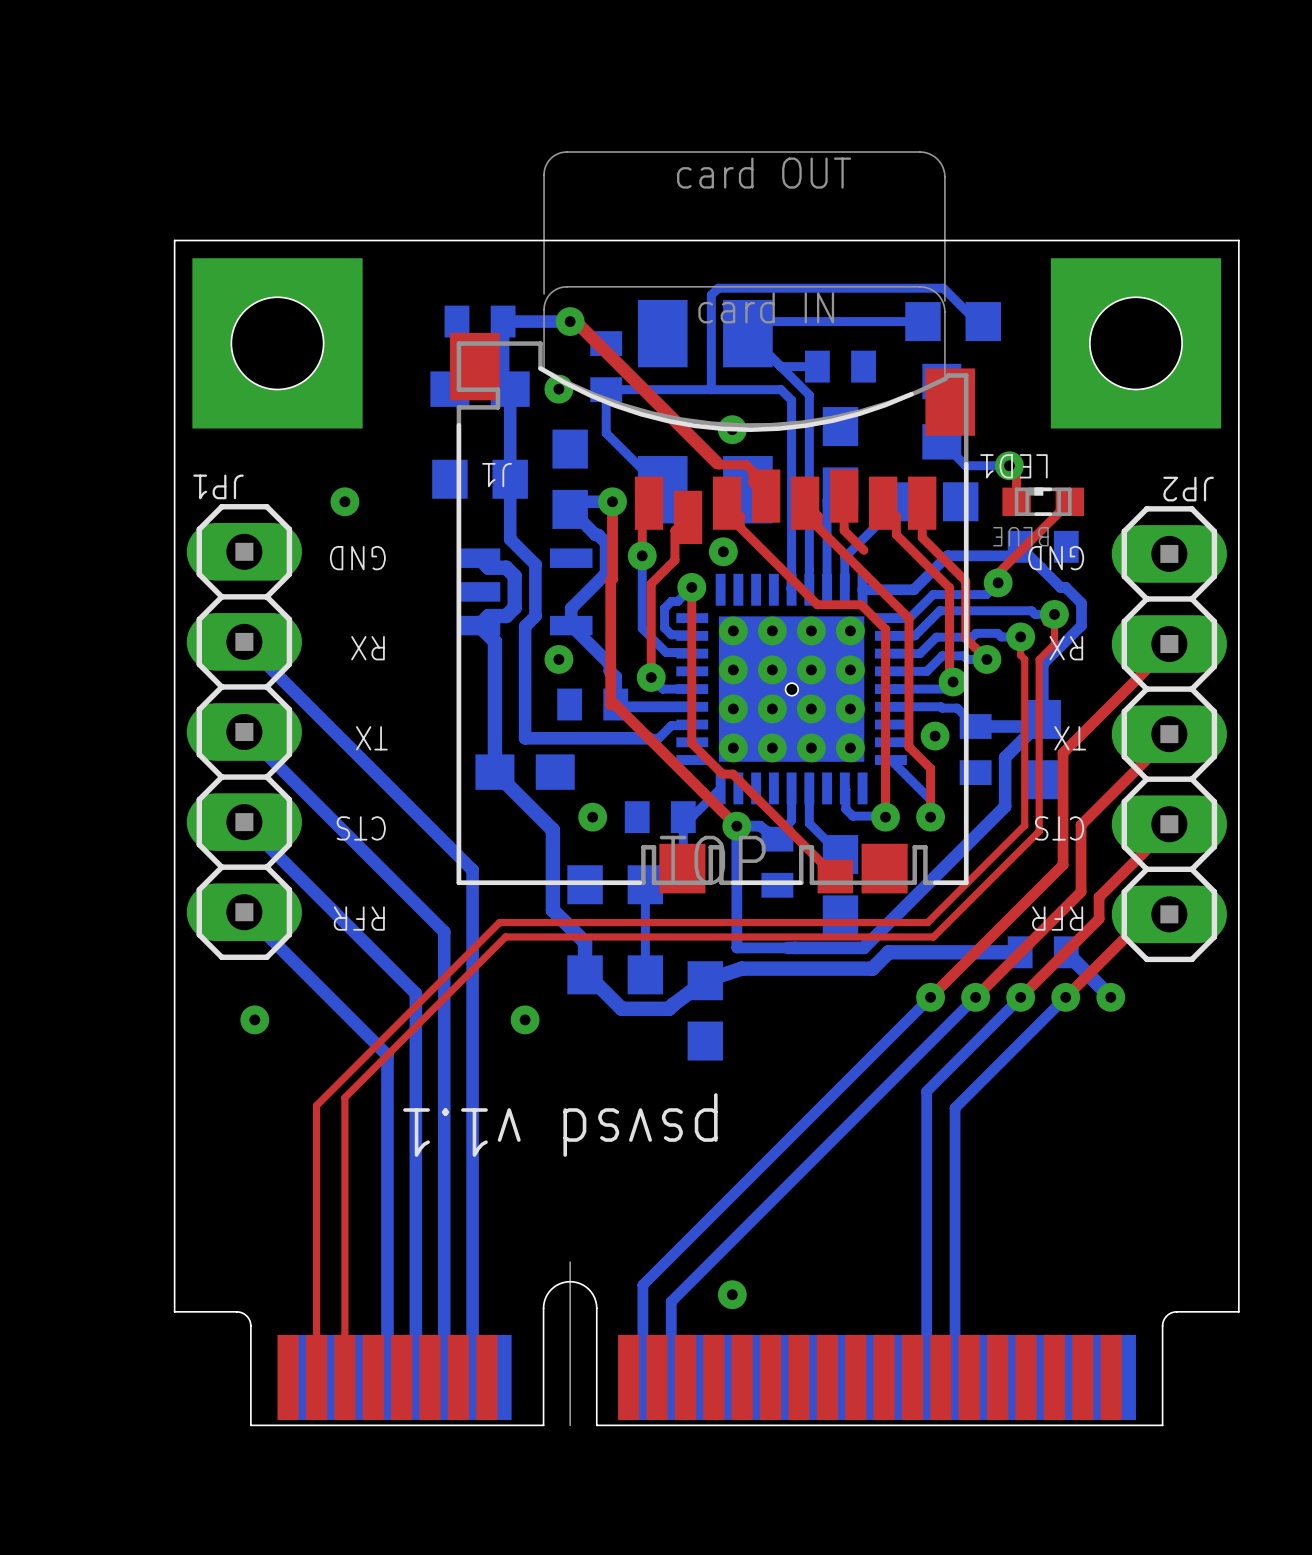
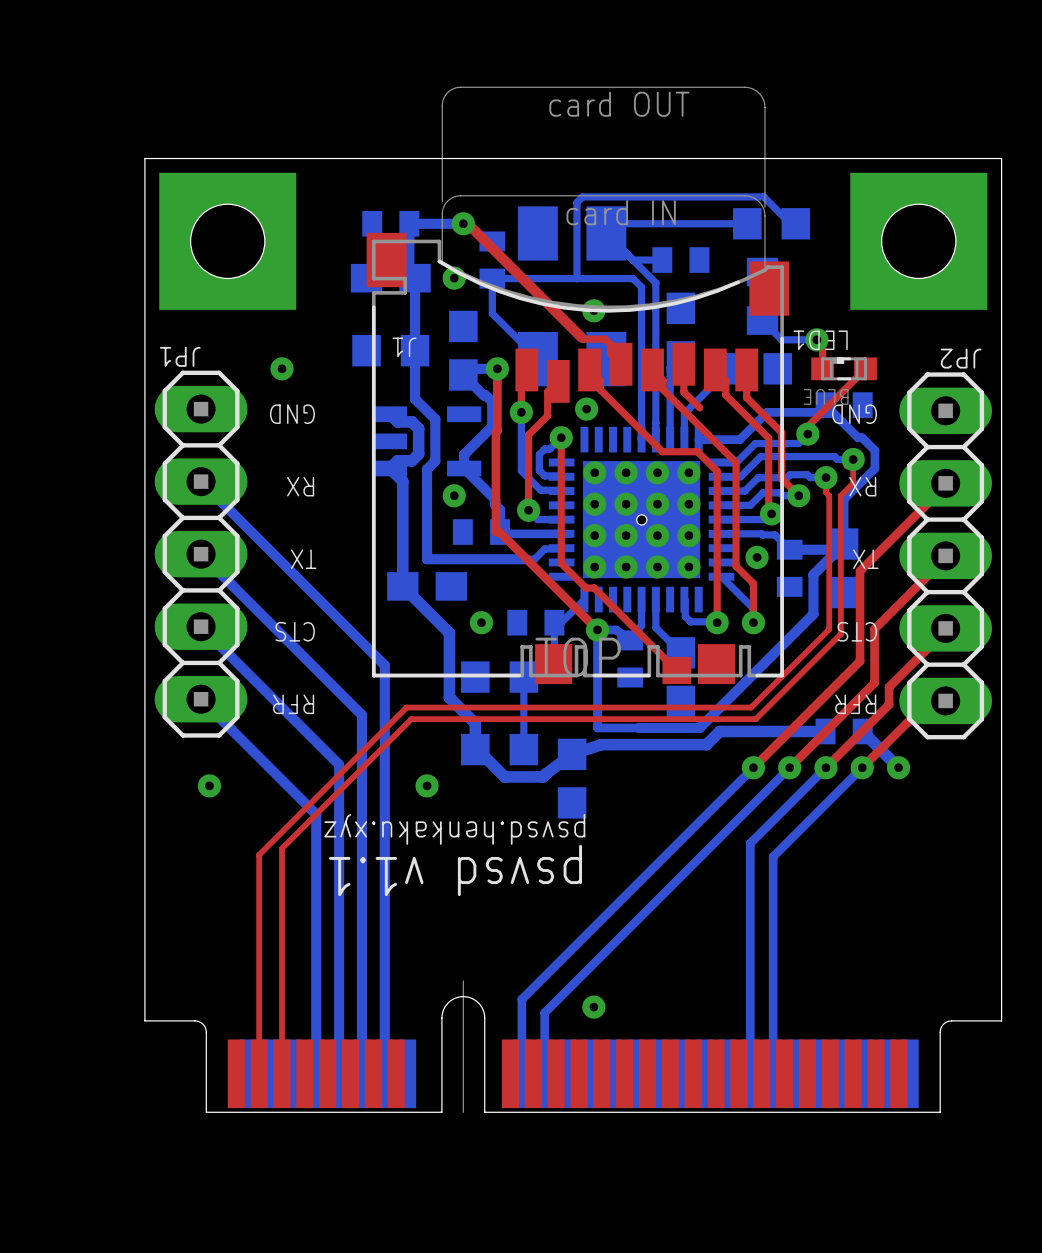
text: none -> psvsd.henkaku.xyz (454, 829)

